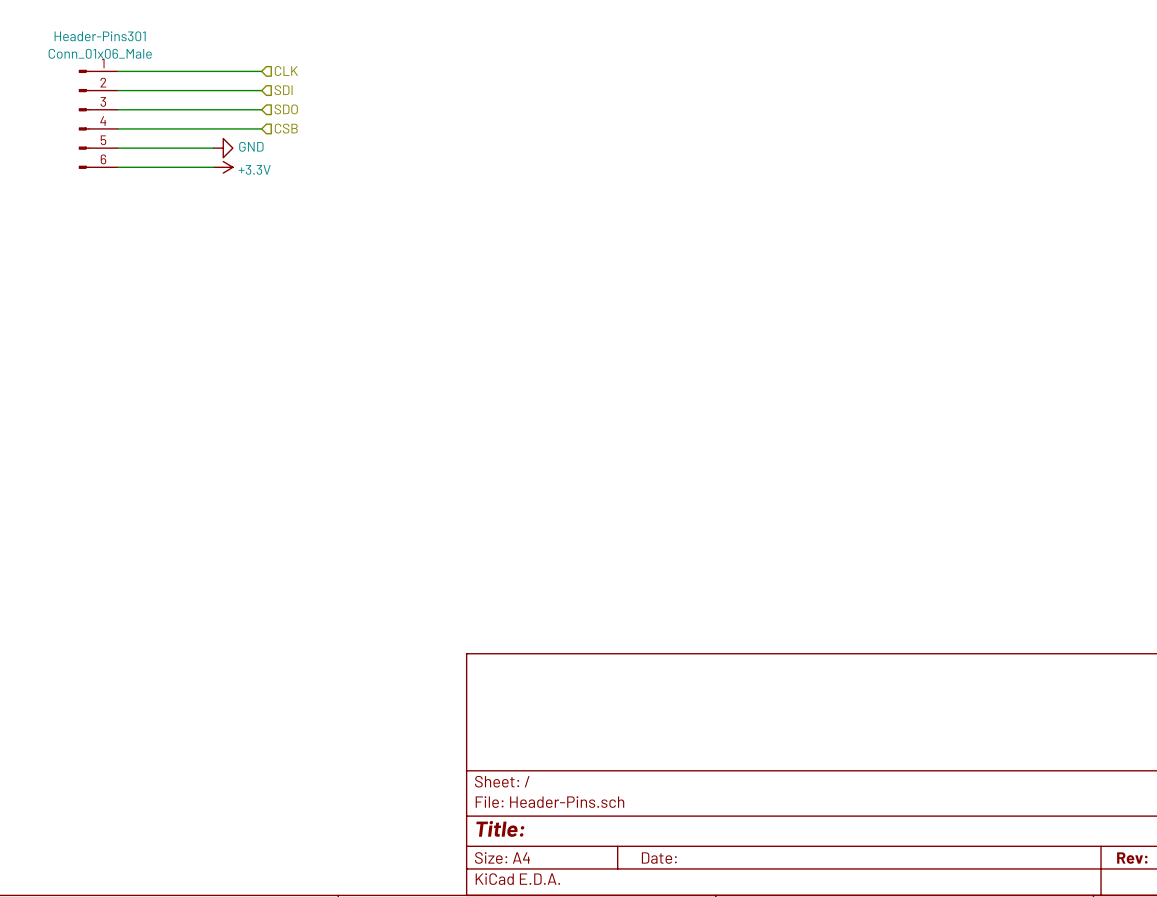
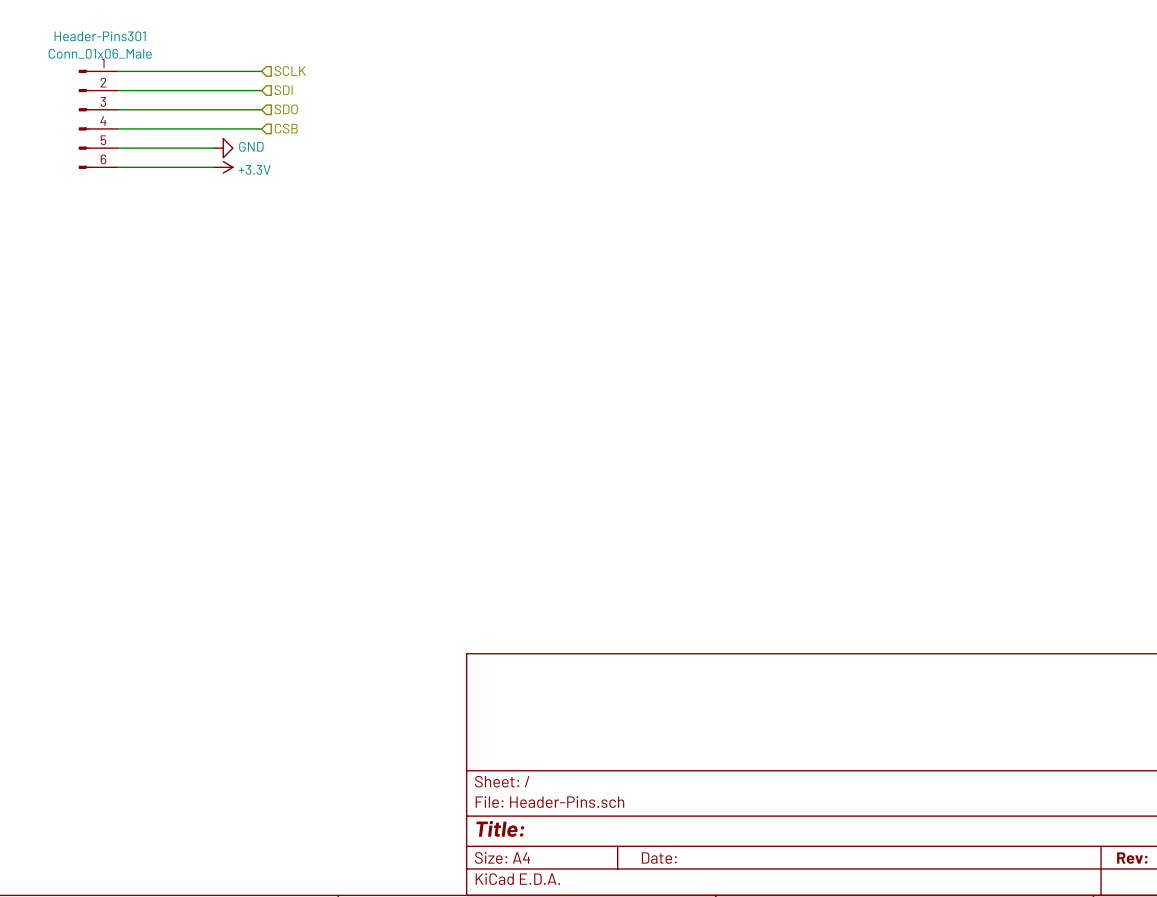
hierarchical label: CLK (286, 71) -> SCLK (290, 71)

